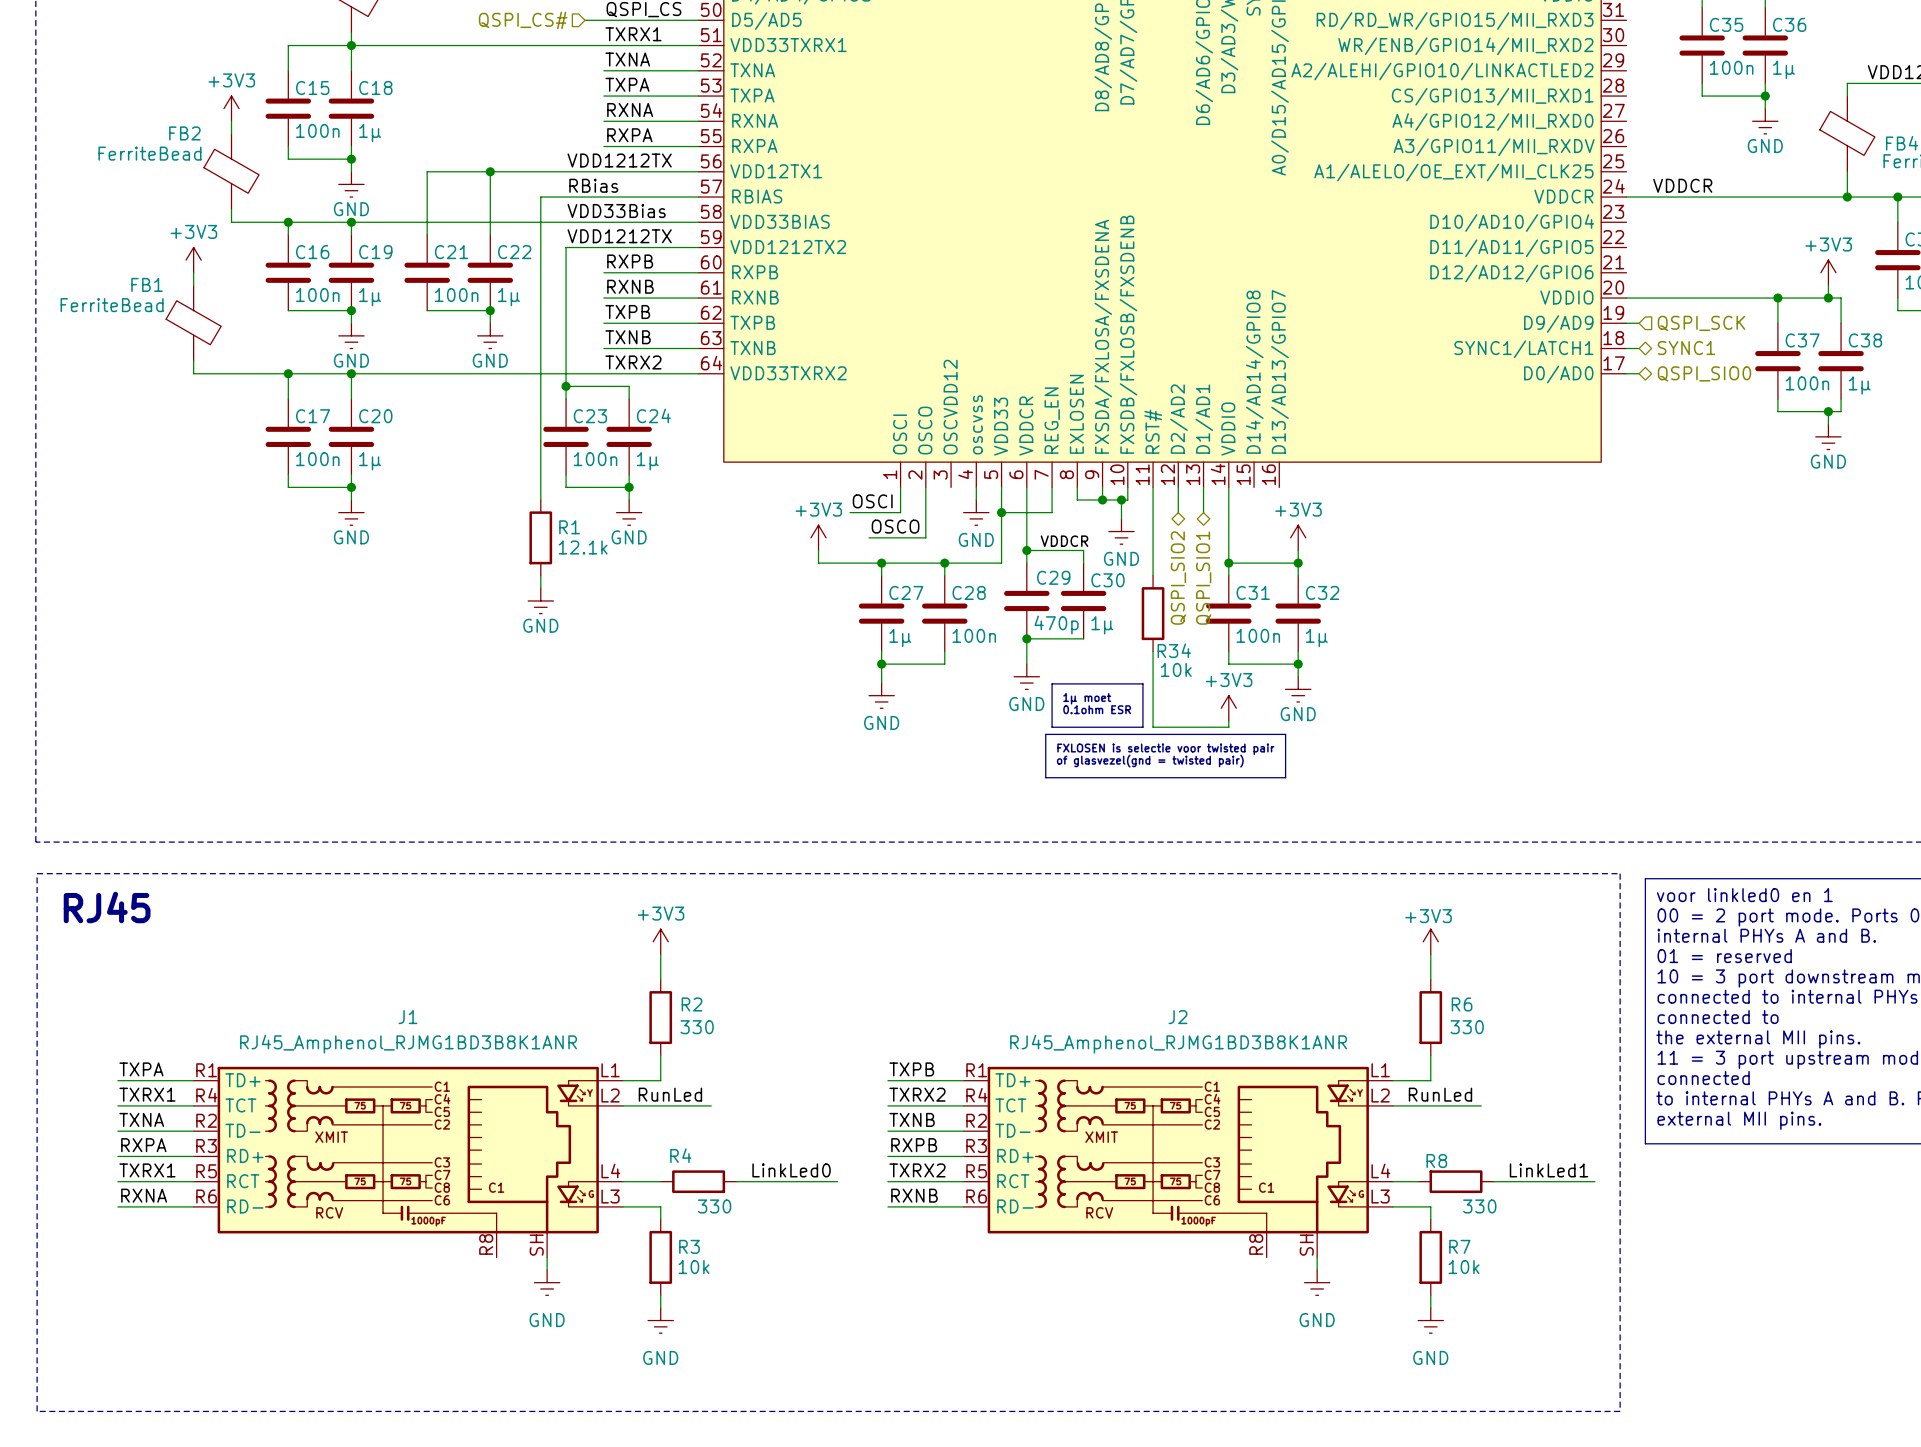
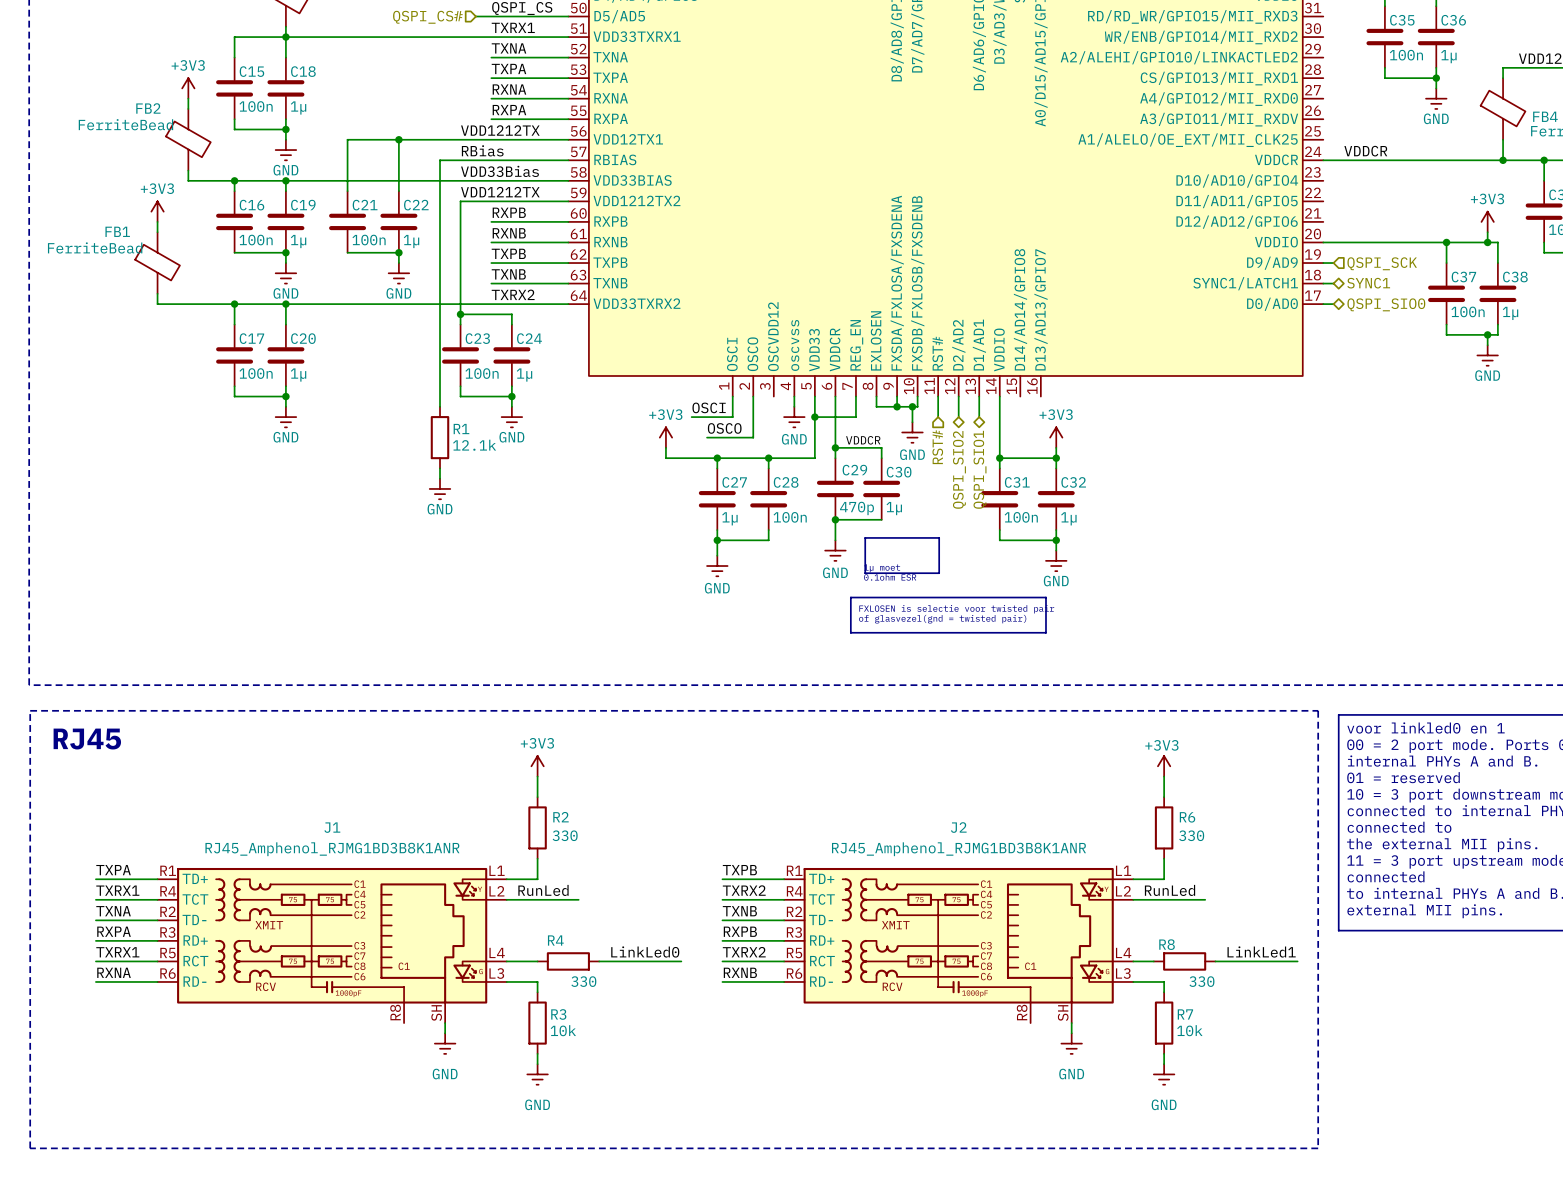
wire: (1153, 512) (1153, 575) -> none
hierarchical label: none -> RST# (937, 447)
R34: 10k (1153, 613) -> none
wire: (1153, 651) (1153, 727) (1228, 727) (1228, 720) -> none
line: (1052, 683) (1142, 683) (1142, 727) (1052, 727) (1052, 683) -> (865, 537) (939, 537) (939, 573) (865, 573) (865, 537)
power symbol: +3V3 (1228, 708) -> none

